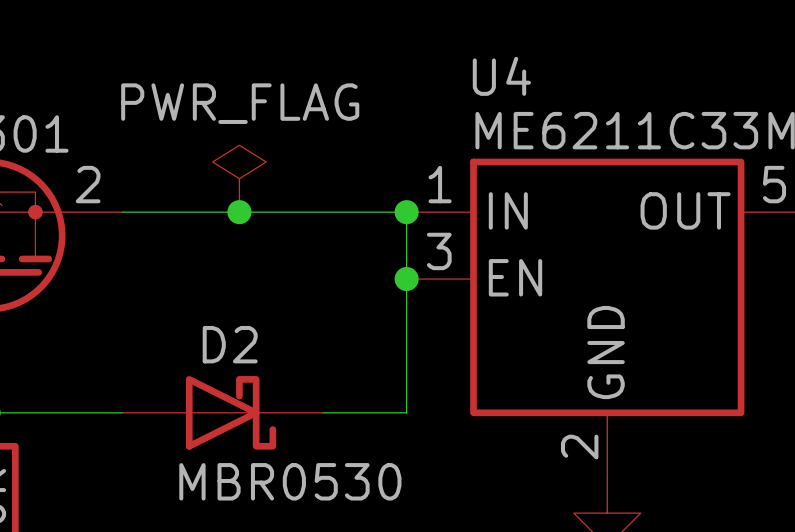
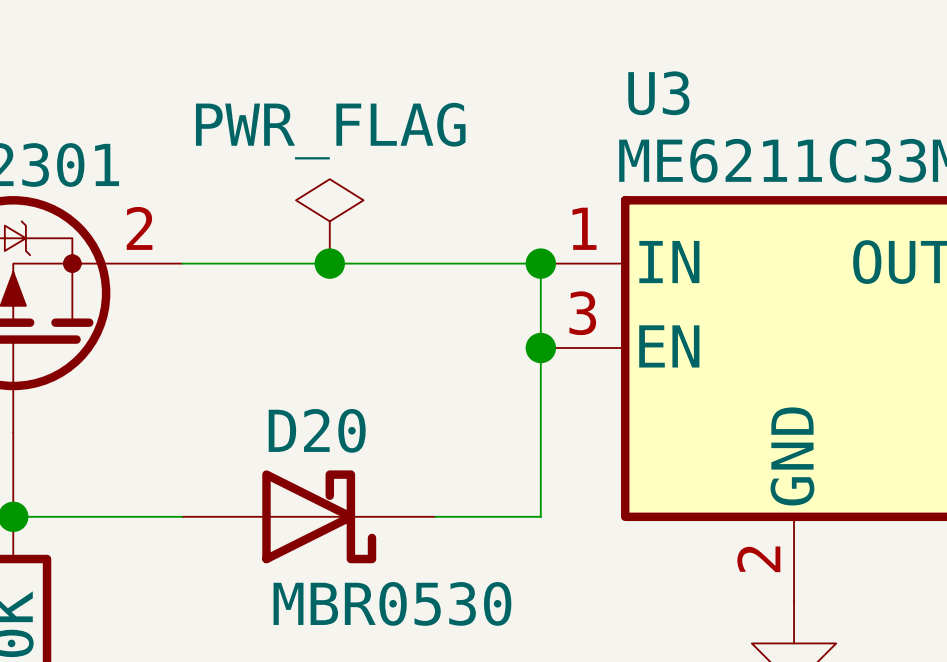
U4 name: U4 (501, 76) -> U3 (658, 93)
D2 name: D2 (230, 344) -> D20 (317, 430)

